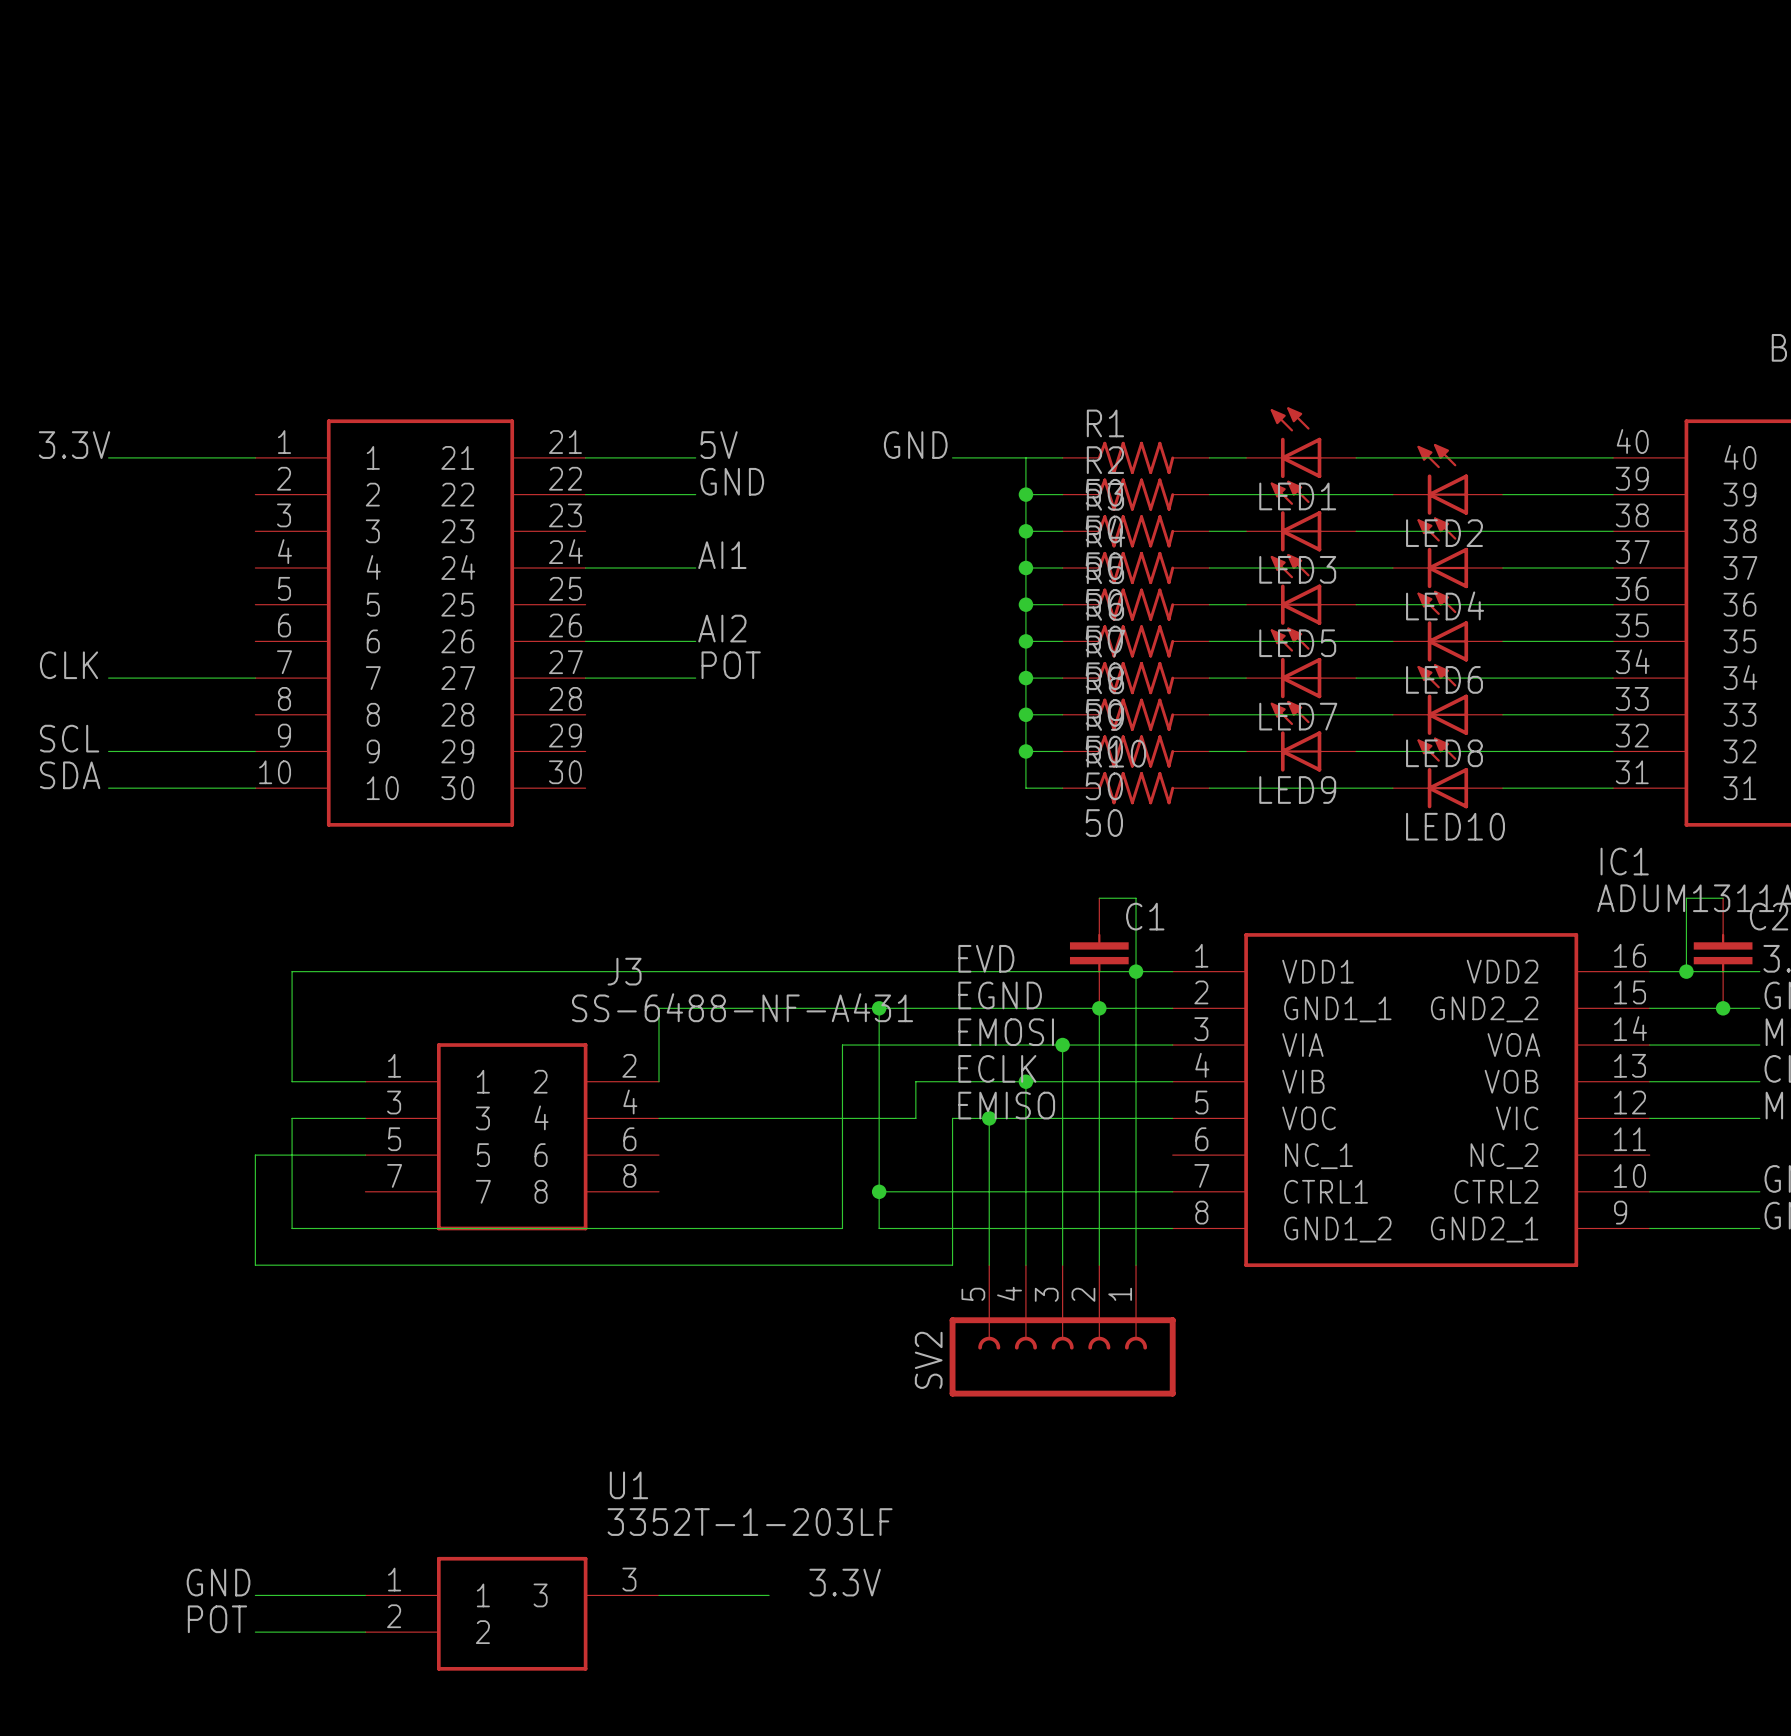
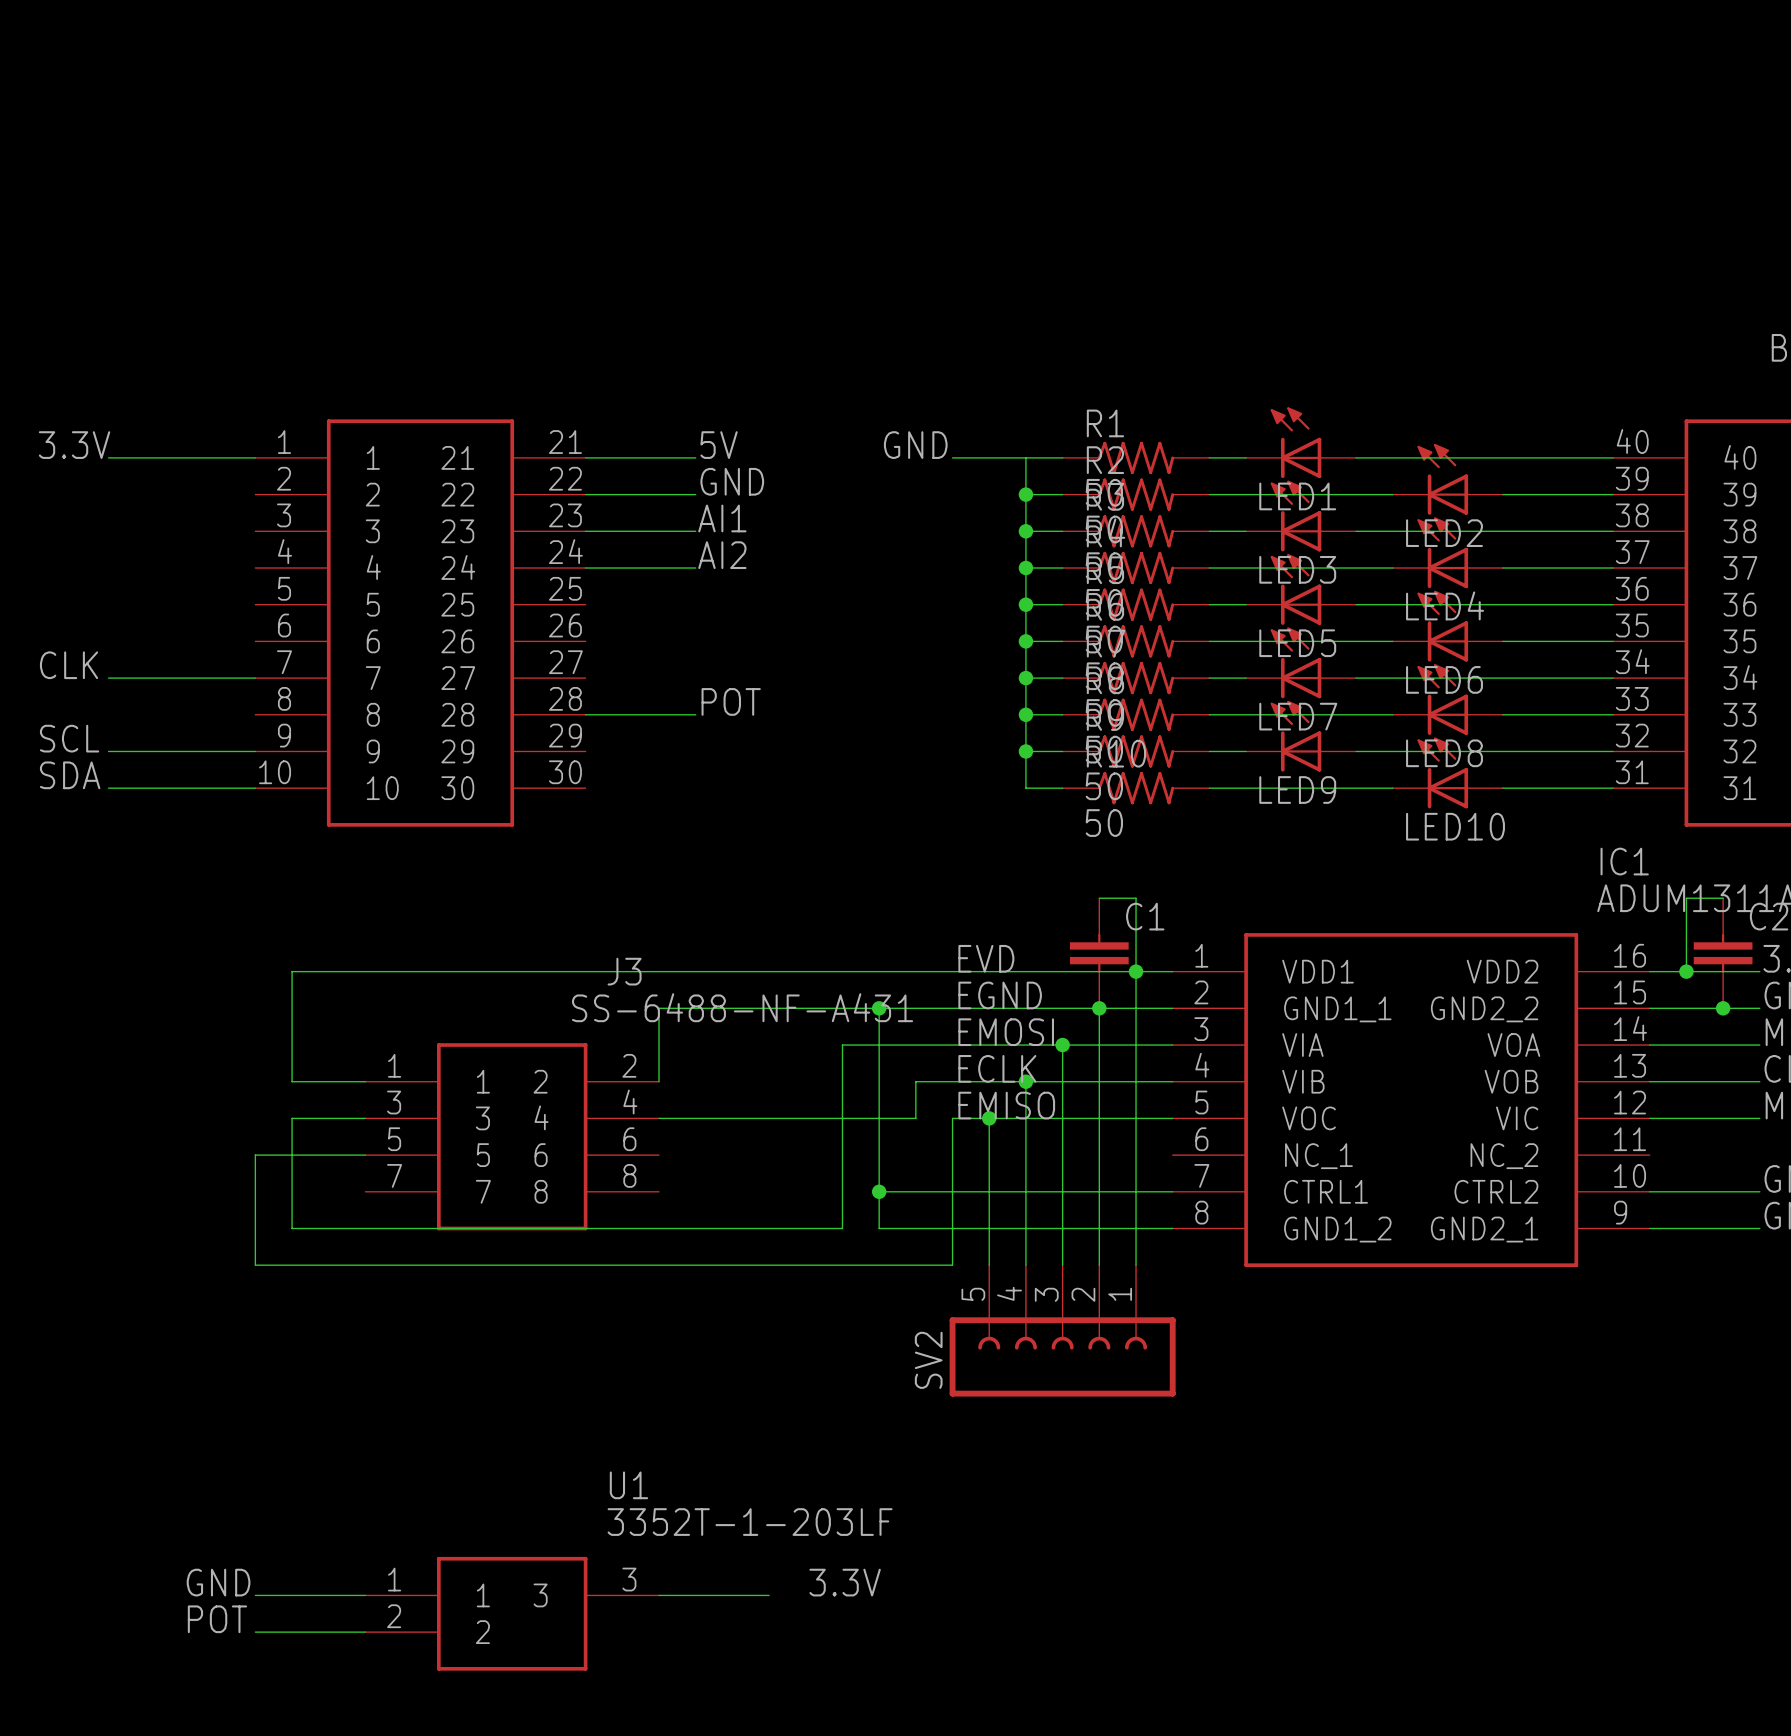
label: none -> AI1 (722, 518)
label: AI1 (722, 555) -> AI2 (722, 555)
label: AI2 (722, 628) -> none
wire: (585, 641) (695, 641) -> (585, 531) (695, 531)
label position: POT (731, 665) -> POT (731, 701)
wire: (585, 678) (695, 678) -> (585, 714) (695, 714)

